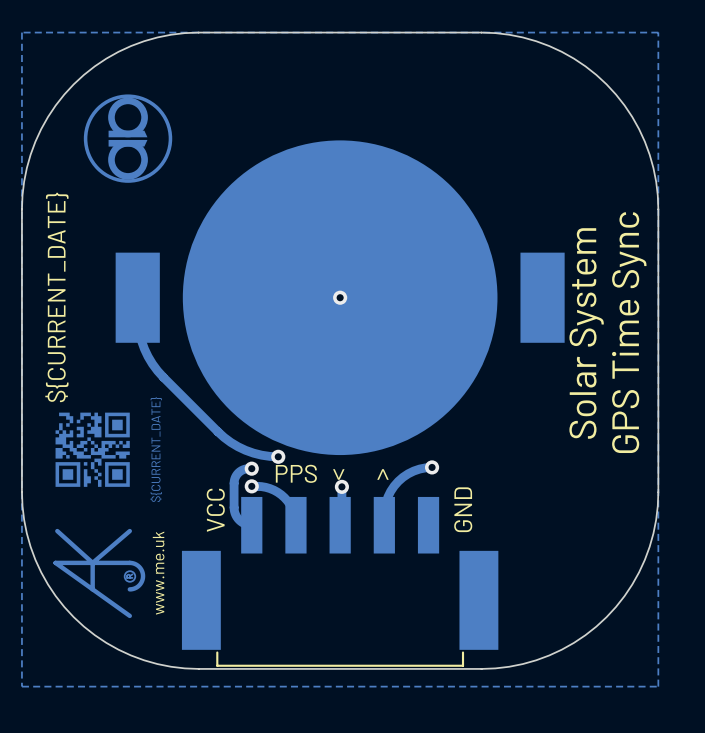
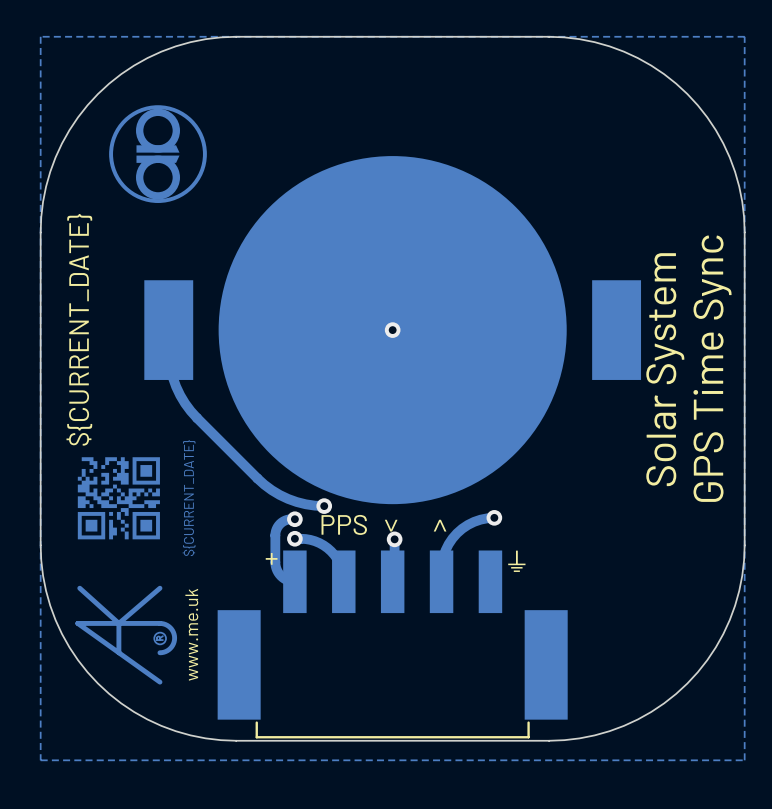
text: GND (463, 509) -> ⏚ (516, 561)
text: VCC (215, 510) -> + (271, 558)

